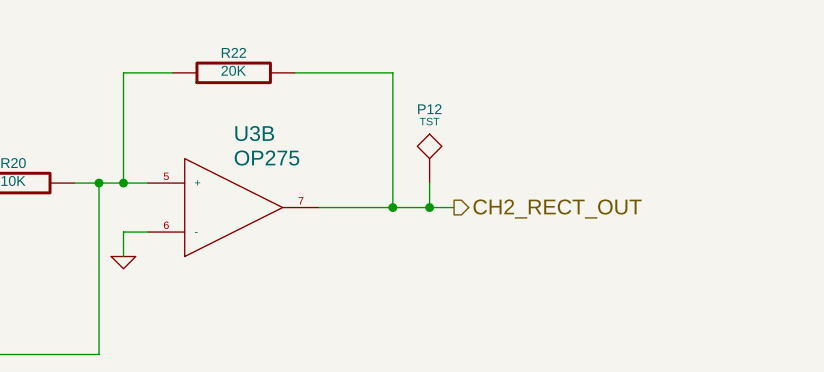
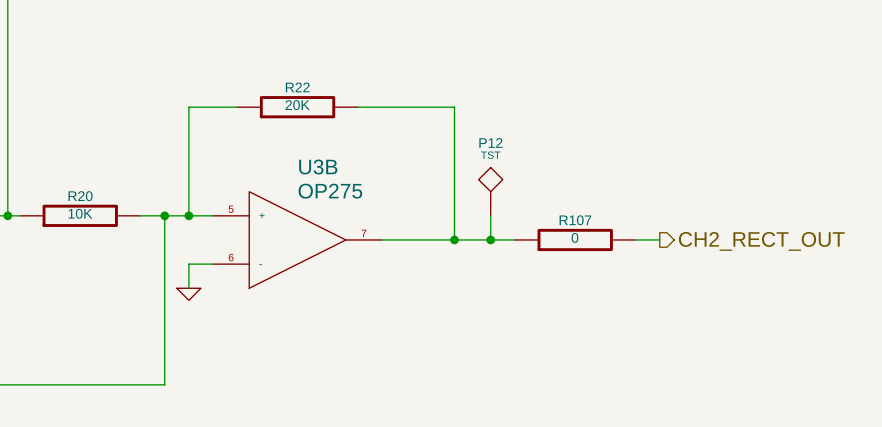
R107: none -> 0 (575, 239)
wire: none -> (635, 239) (659, 239)
hierarchical label position: CH2_RECT_OUT (557, 209) -> CH2_RECT_OUT (761, 241)

